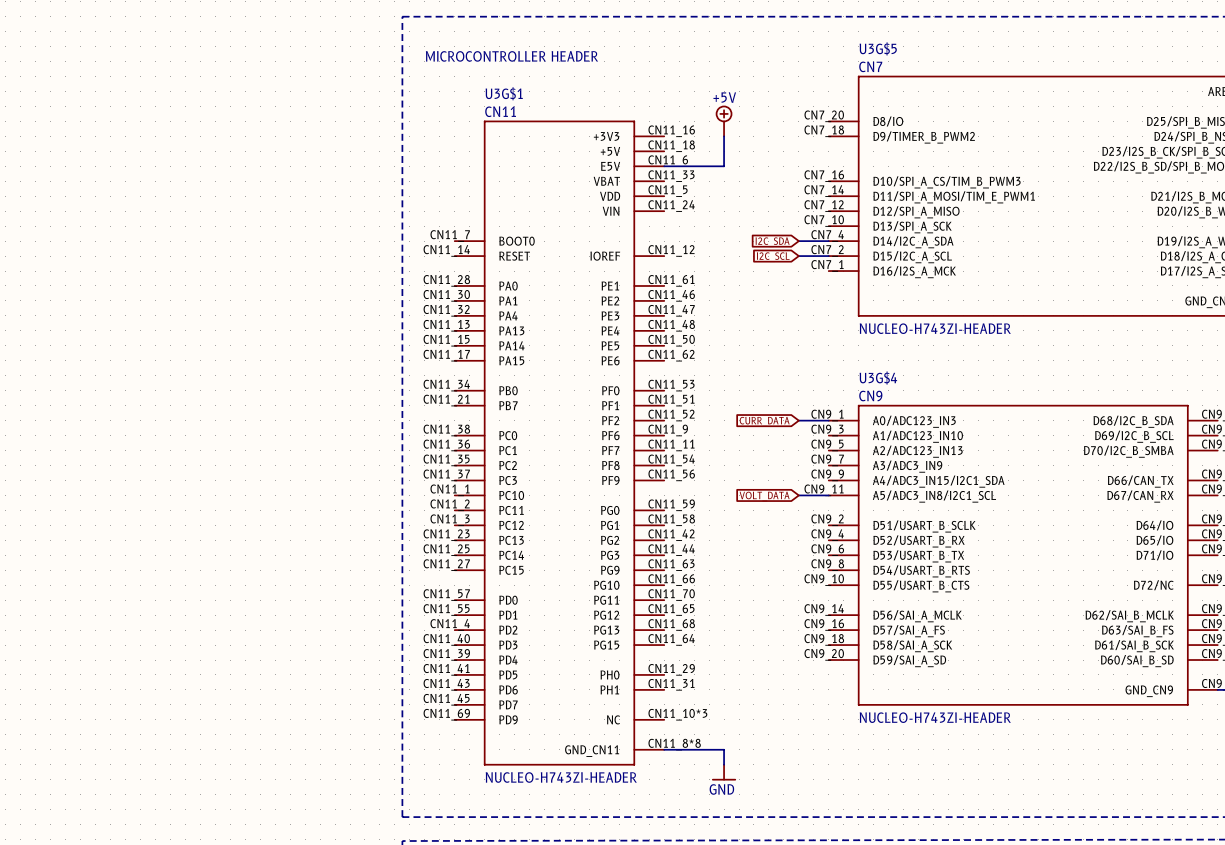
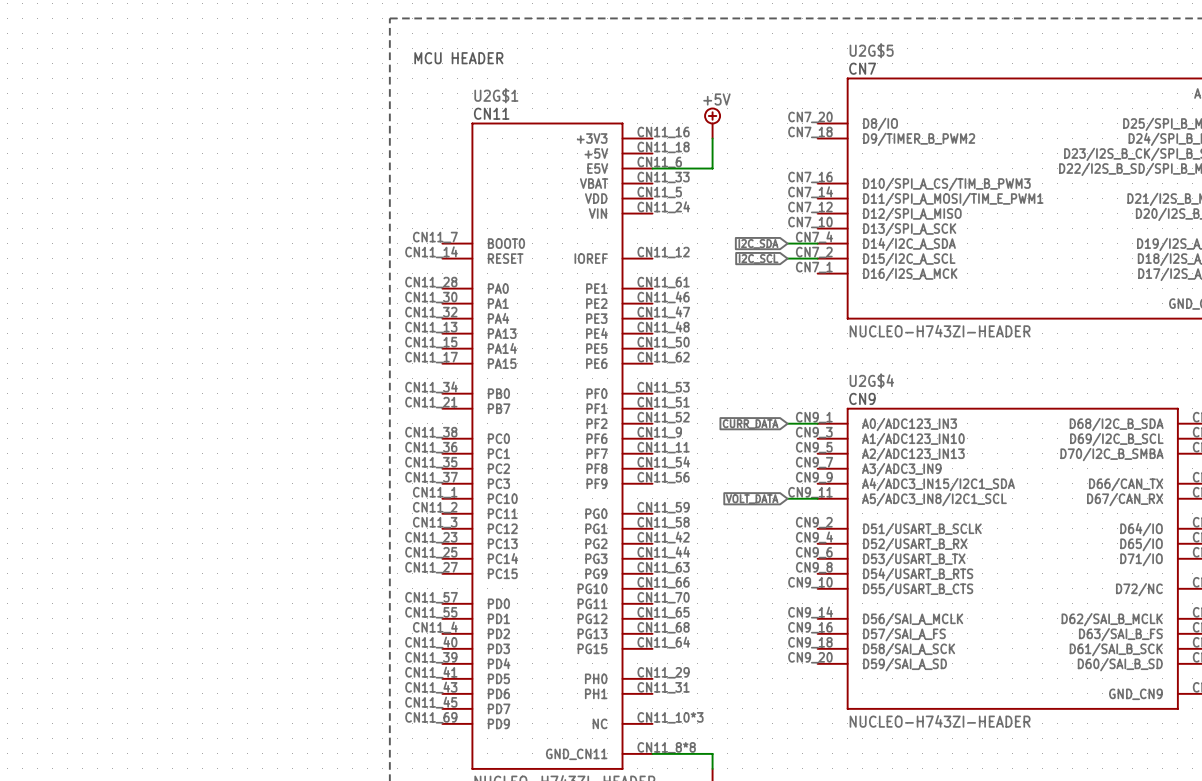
U3G$5 name: U3G$5 (878, 48) -> U2G$5 (871, 50)
text: MICROCONTROLLER HEADER (511, 56) -> MCU HEADER (458, 58)
U3G$1 name: U3G$1 (504, 93) -> U2G$1 (496, 95)
U3G$4 name: U3G$4 (878, 377) -> U2G$4 (871, 380)

